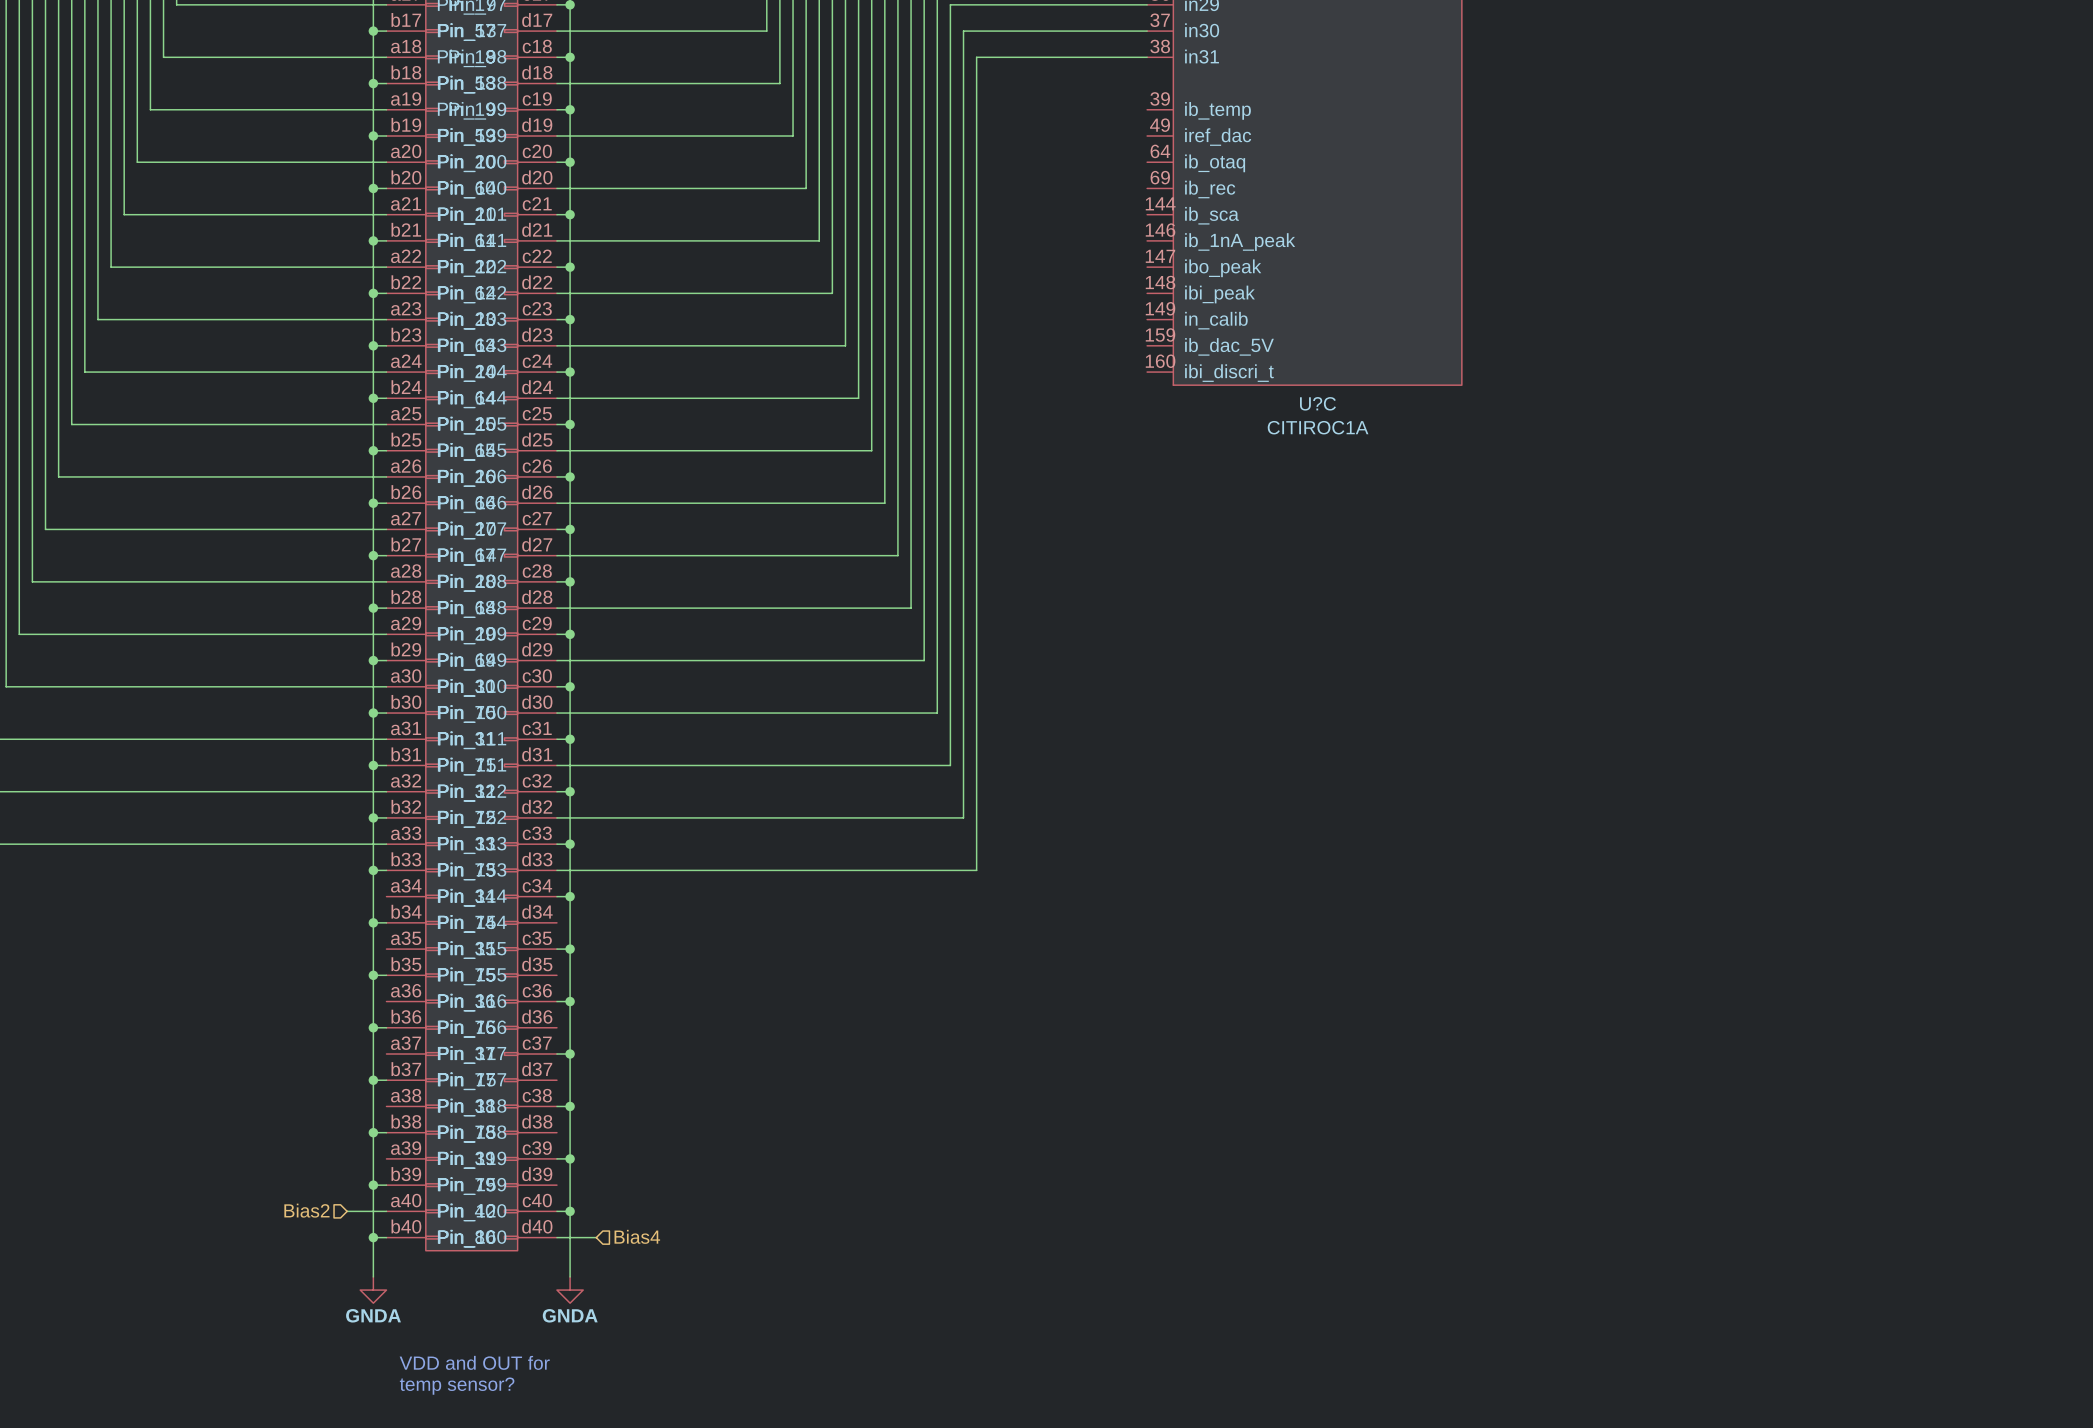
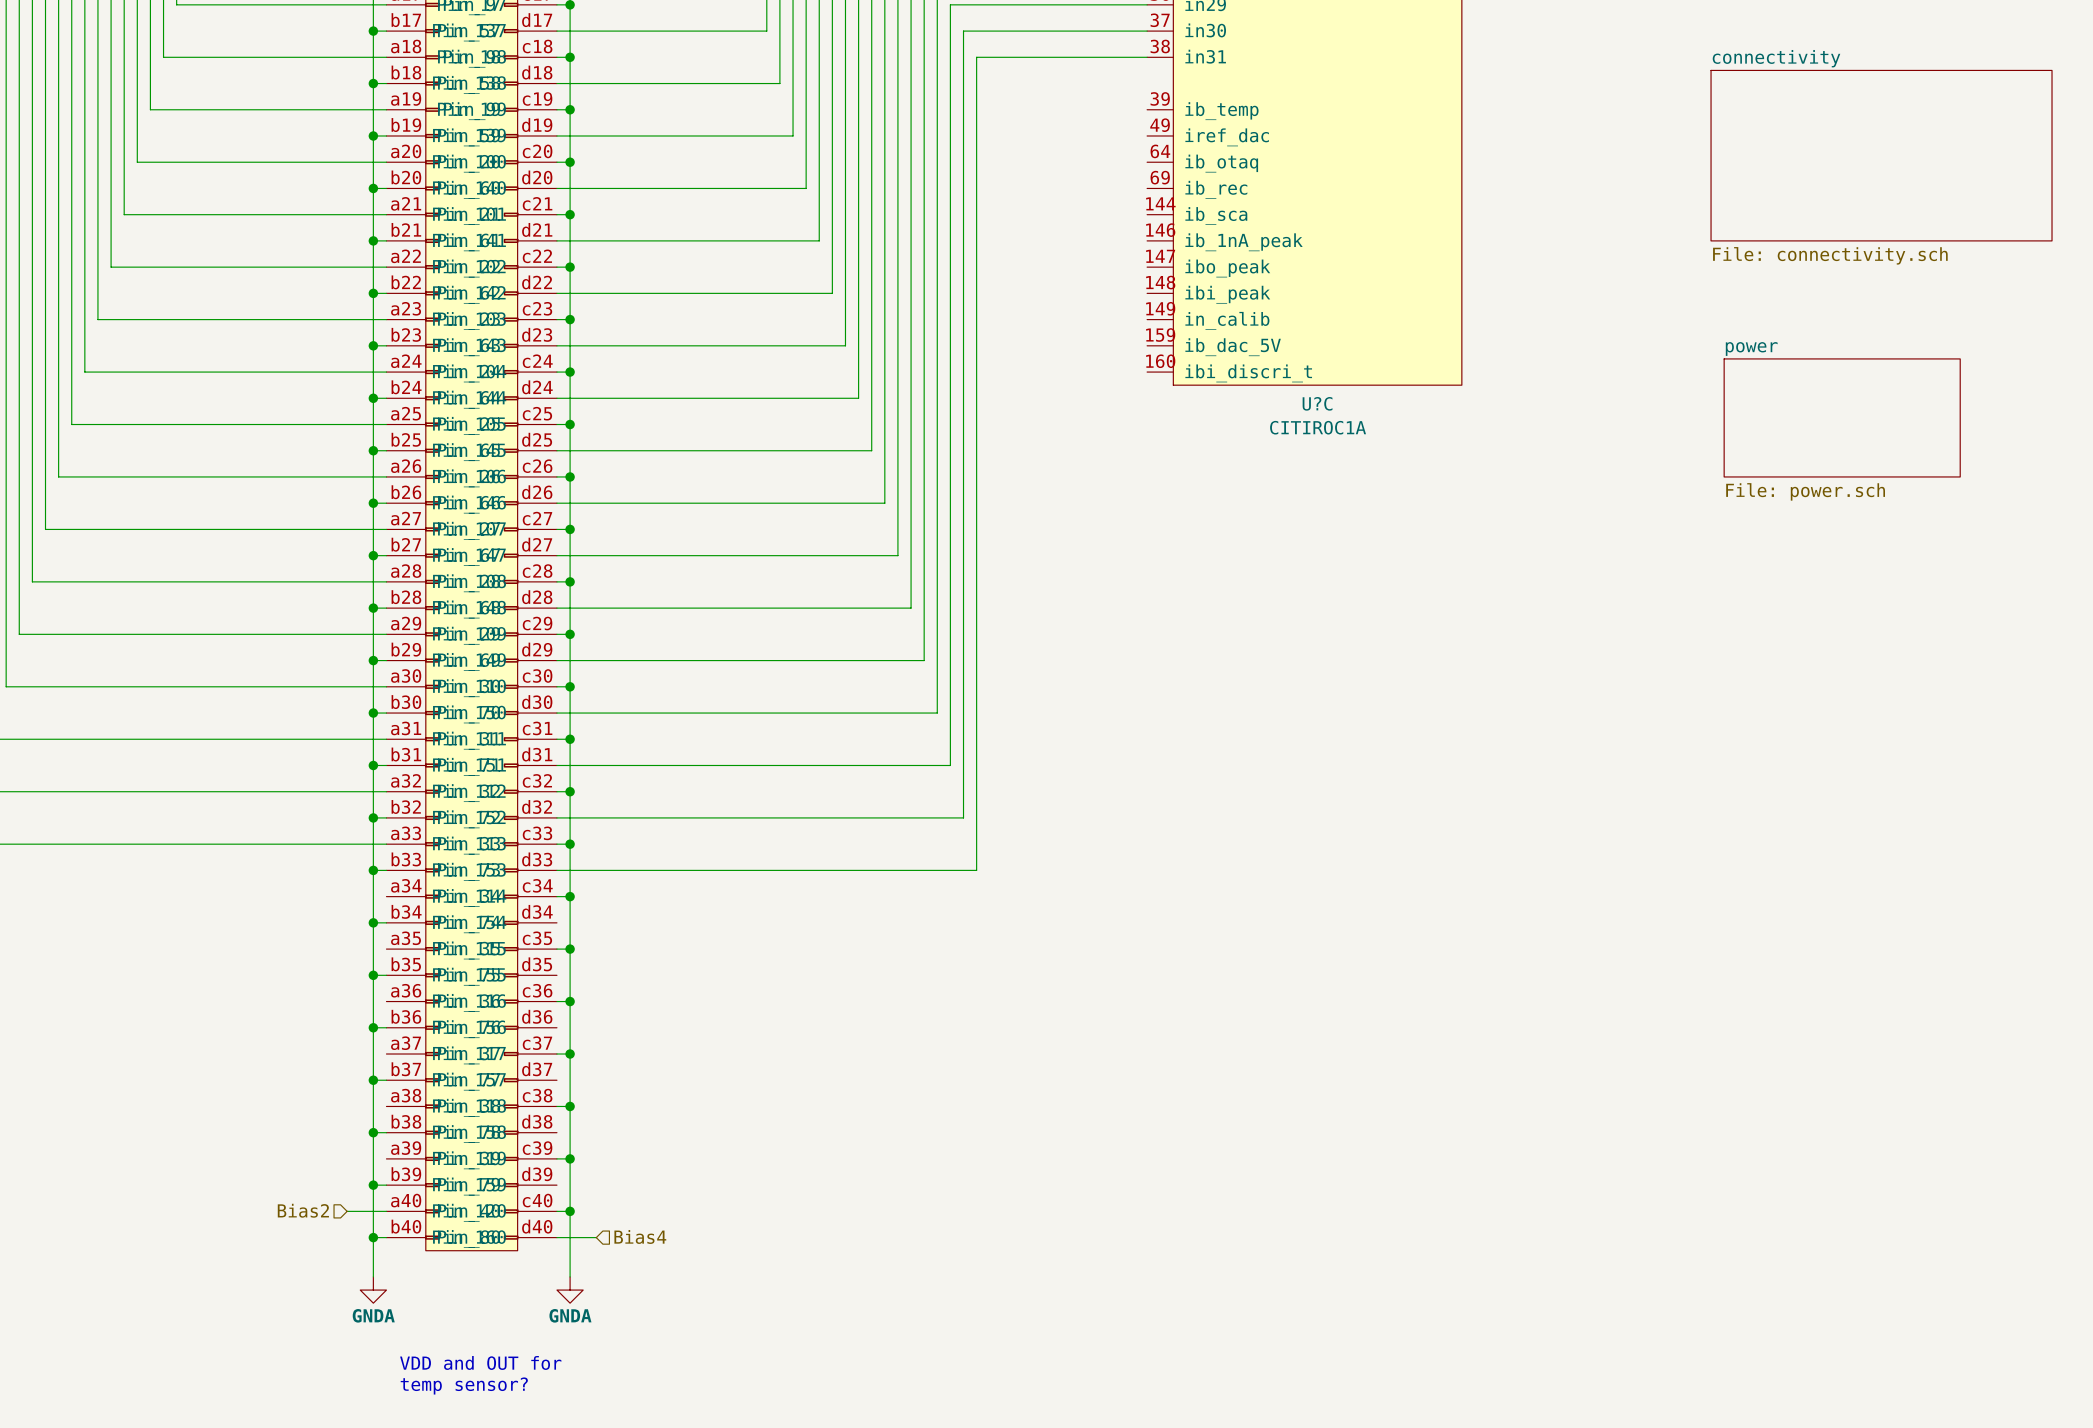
sheet connectivity: none -> File: connectivity.sch (1881, 155)
sheet power: none -> File: power.sch (1842, 417)

